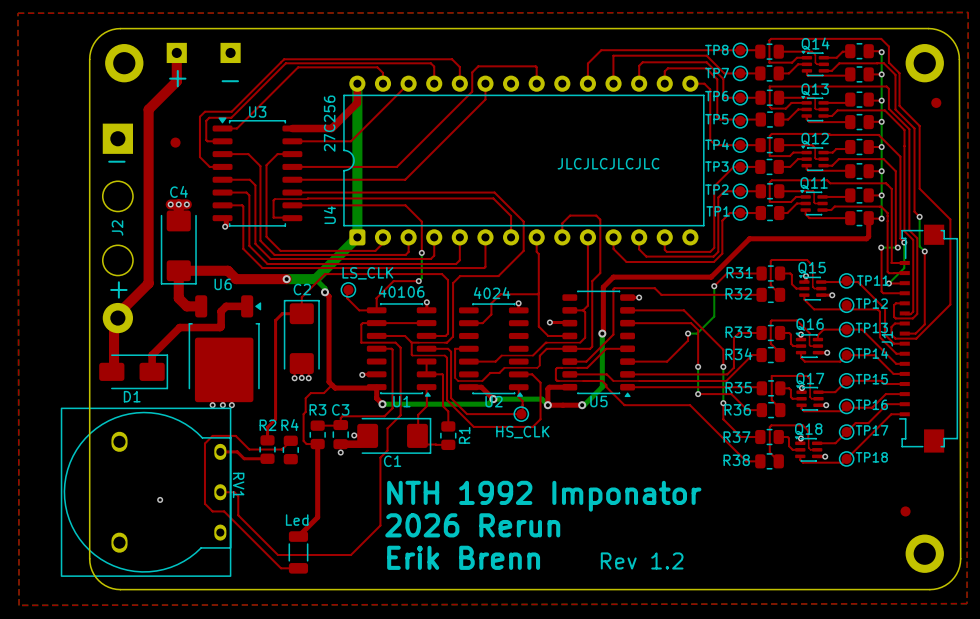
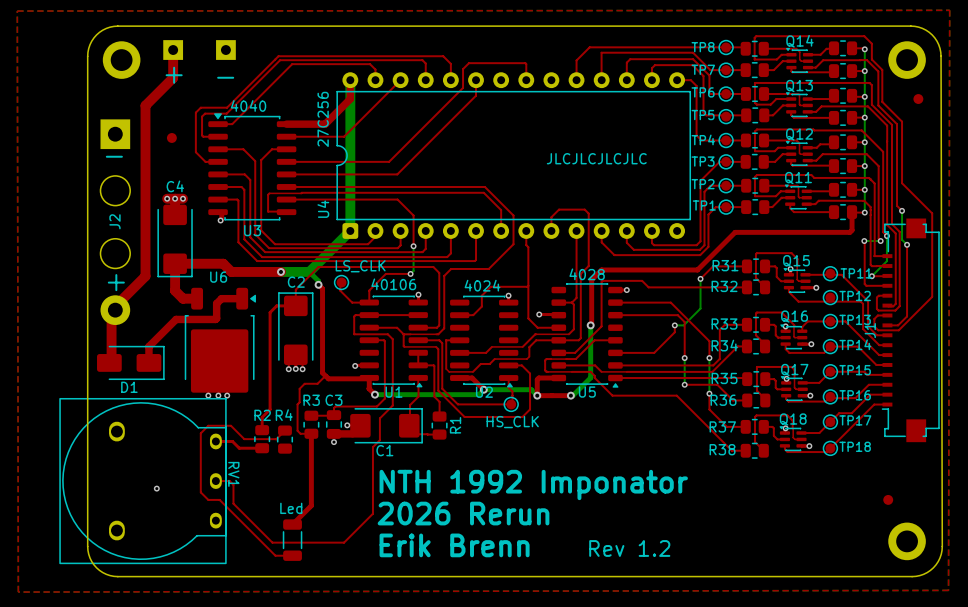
U3 text: none -> 4040 (248, 105)
U3 name position: U3 (257, 111) -> U3 (252, 230)
U5 text: none -> 4028 (587, 274)

